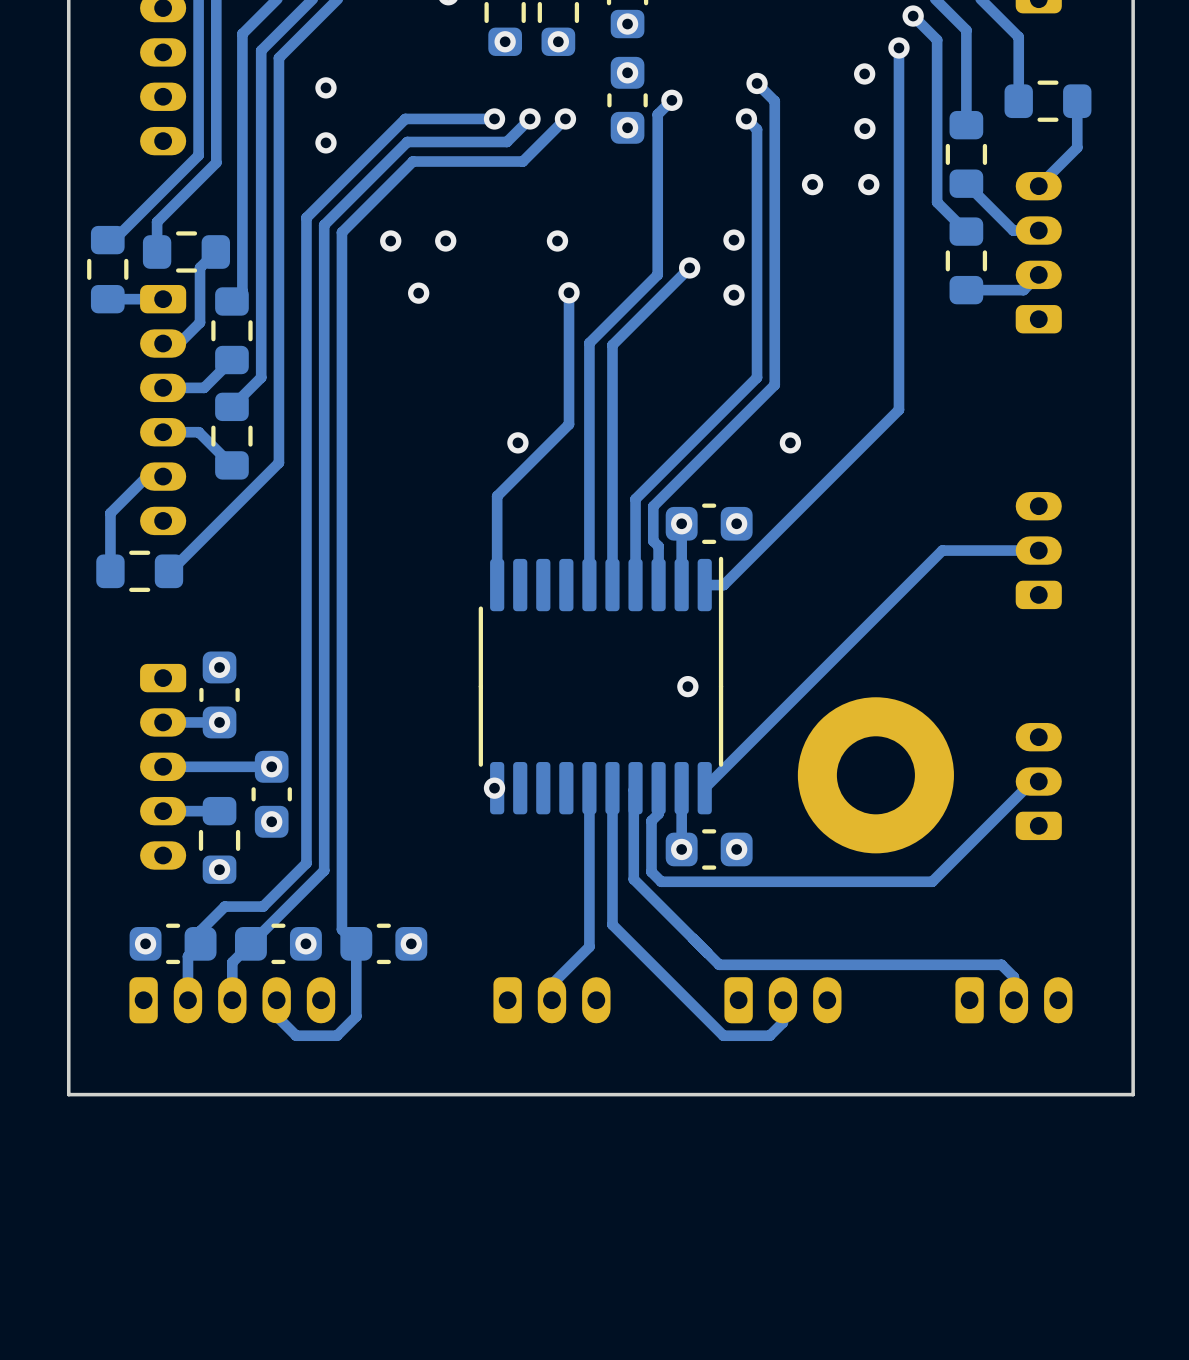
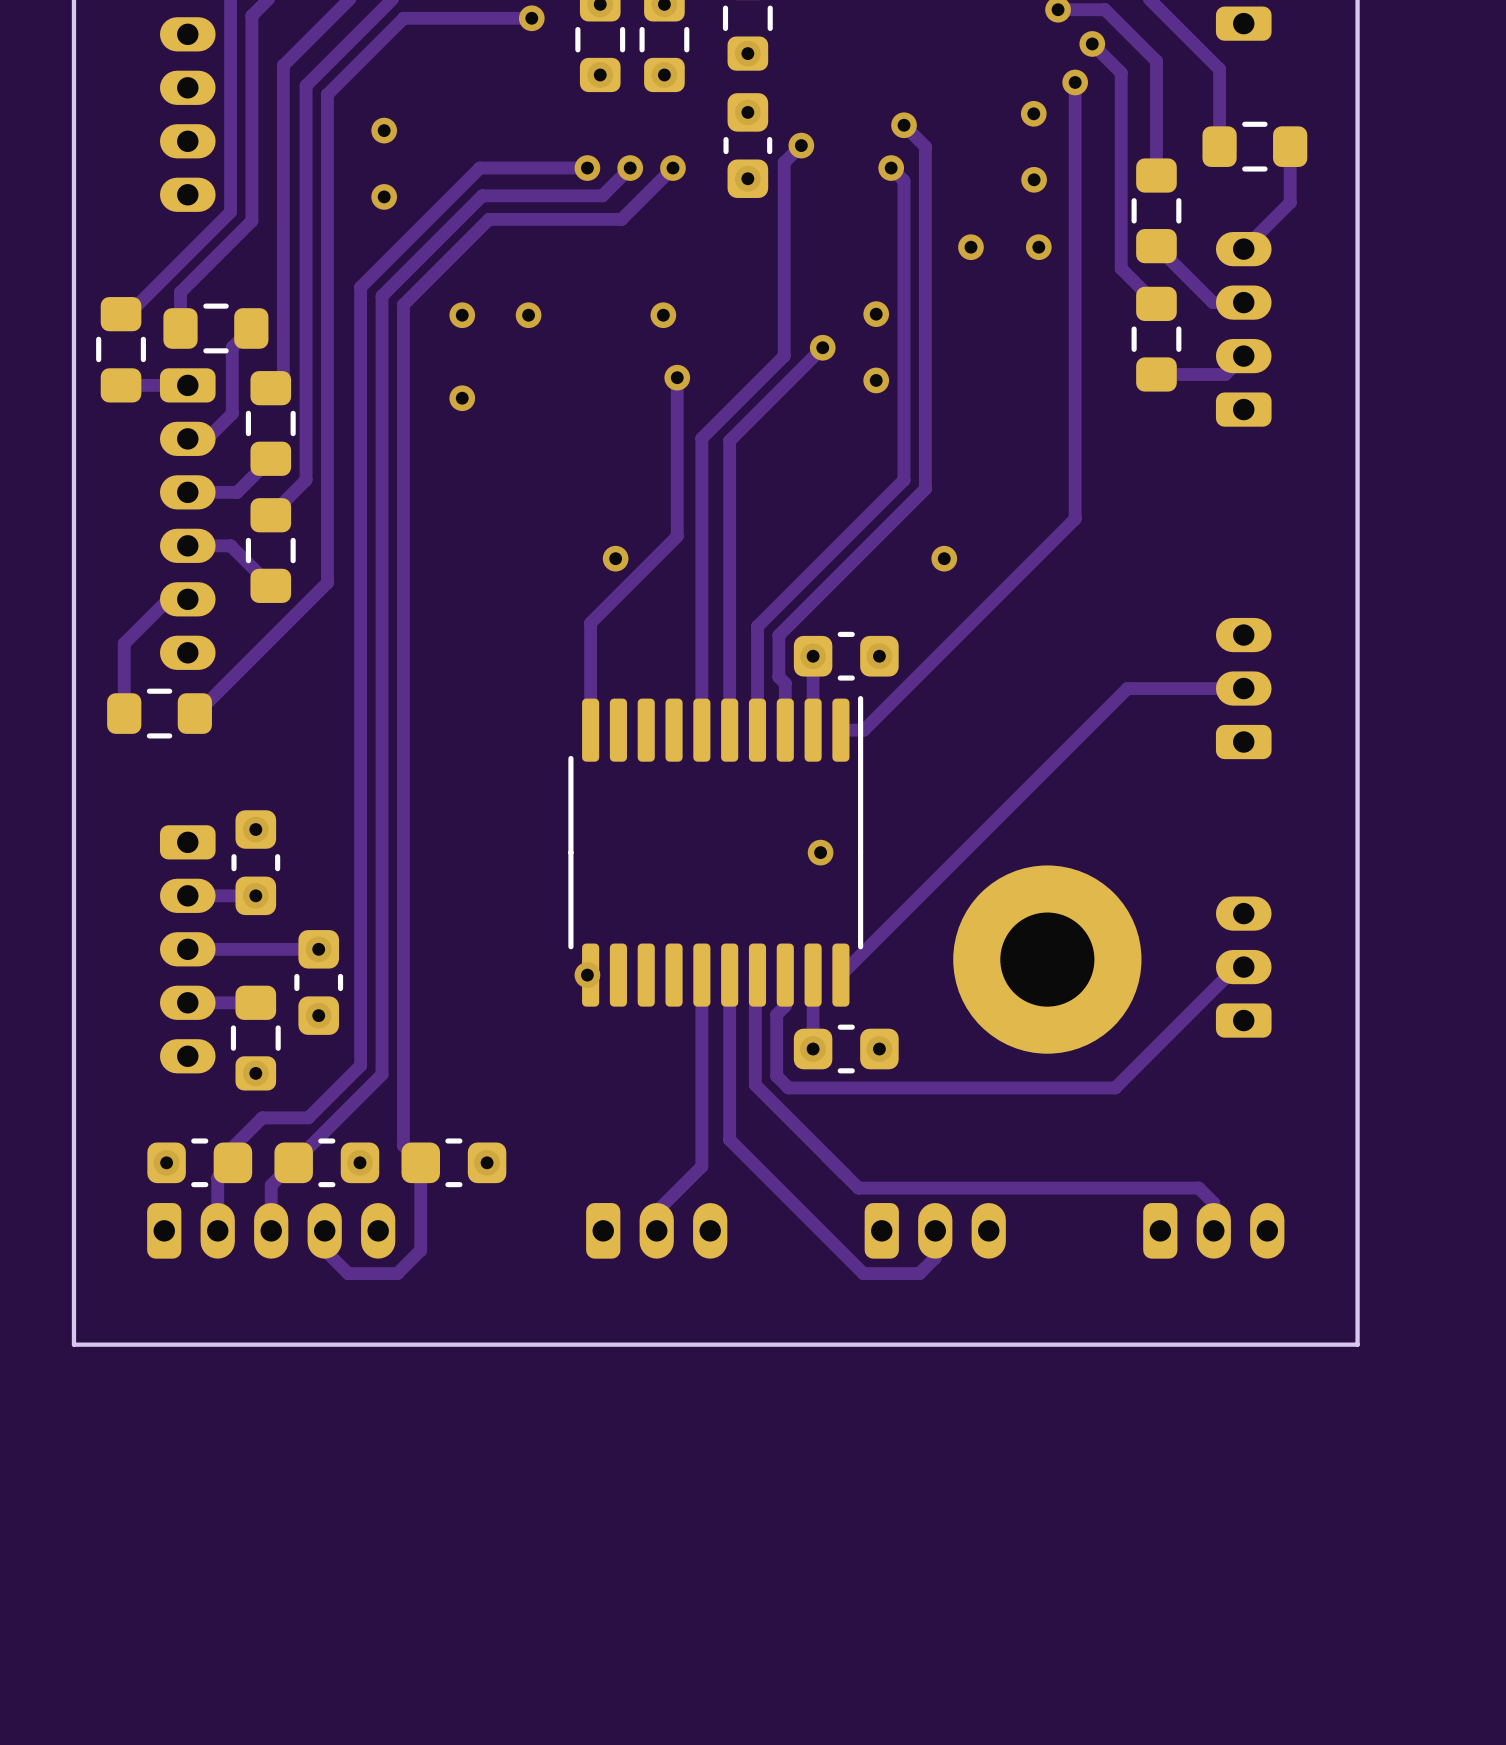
via position: (418, 293) -> (462, 398)

